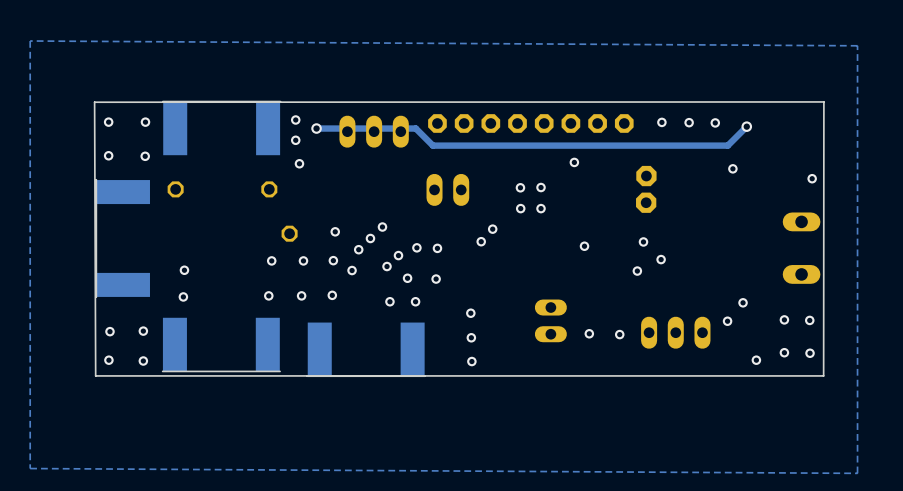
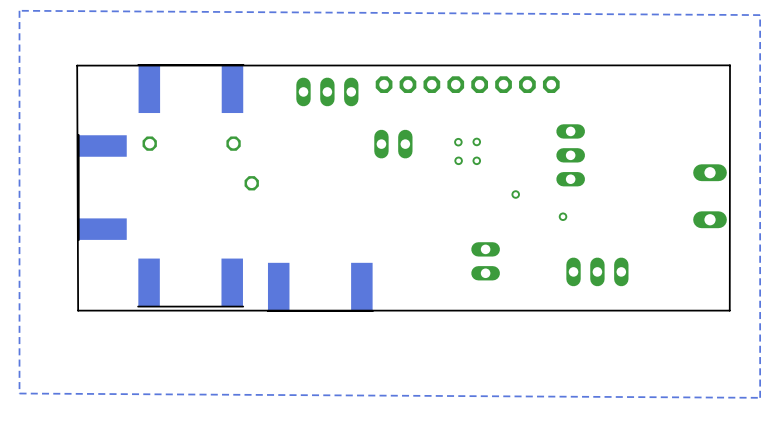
via: (295, 120) -> none
via: (108, 122) -> none
via: (145, 122) -> none
via: (661, 122) -> none
via: (689, 122) -> none
via: (715, 122) -> none
track: (746, 126) (727, 145) (432, 145) (415, 128) (316, 128) -> none
via: (746, 126) -> none
via: (316, 128) -> none
via: (295, 140) -> none
via: (108, 155) -> none
via: (145, 156) -> none
via: (574, 162) -> none
via: (299, 163) -> none
via: (732, 168) -> none
part: (646, 176) -> none
via: (812, 178) -> none
part footprint: [636, 192, 657, 213] -> [556, 124, 585, 187]
via: (382, 227) -> none
via: (492, 229) -> none
via: (335, 231) -> none
via: (370, 238) -> none
via: (481, 241) -> none
via: (643, 241) -> none
via: (416, 247) -> none
via: (437, 248) -> none
via: (358, 249) -> none
via: (398, 255) -> none
via: (661, 259) -> none
via: (271, 260) -> none
via: (303, 260) -> none
via: (333, 260) -> none
via: (387, 266) -> none
via: (184, 270) -> none
via: (352, 270) -> none
via: (407, 278) -> none
via: (436, 279) -> none
via: (268, 295) -> none
via: (301, 295) -> none
via: (332, 295) -> none
via: (183, 296) -> none
via: (389, 301) -> none
via: (415, 301) -> none
via: (743, 302) -> none
via: (470, 313) -> none
via: (784, 319) -> none
via: (809, 320) -> none
via: (727, 321) -> none
via: (109, 331) -> none
via: (143, 331) -> none
via: (589, 333) -> none
via: (619, 334) -> none
via: (471, 337) -> none
via: (784, 352) -> none
via: (810, 353) -> none
via: (108, 360) -> none
via: (143, 360) -> none
via: (756, 360) -> none
via: (471, 361) -> none

